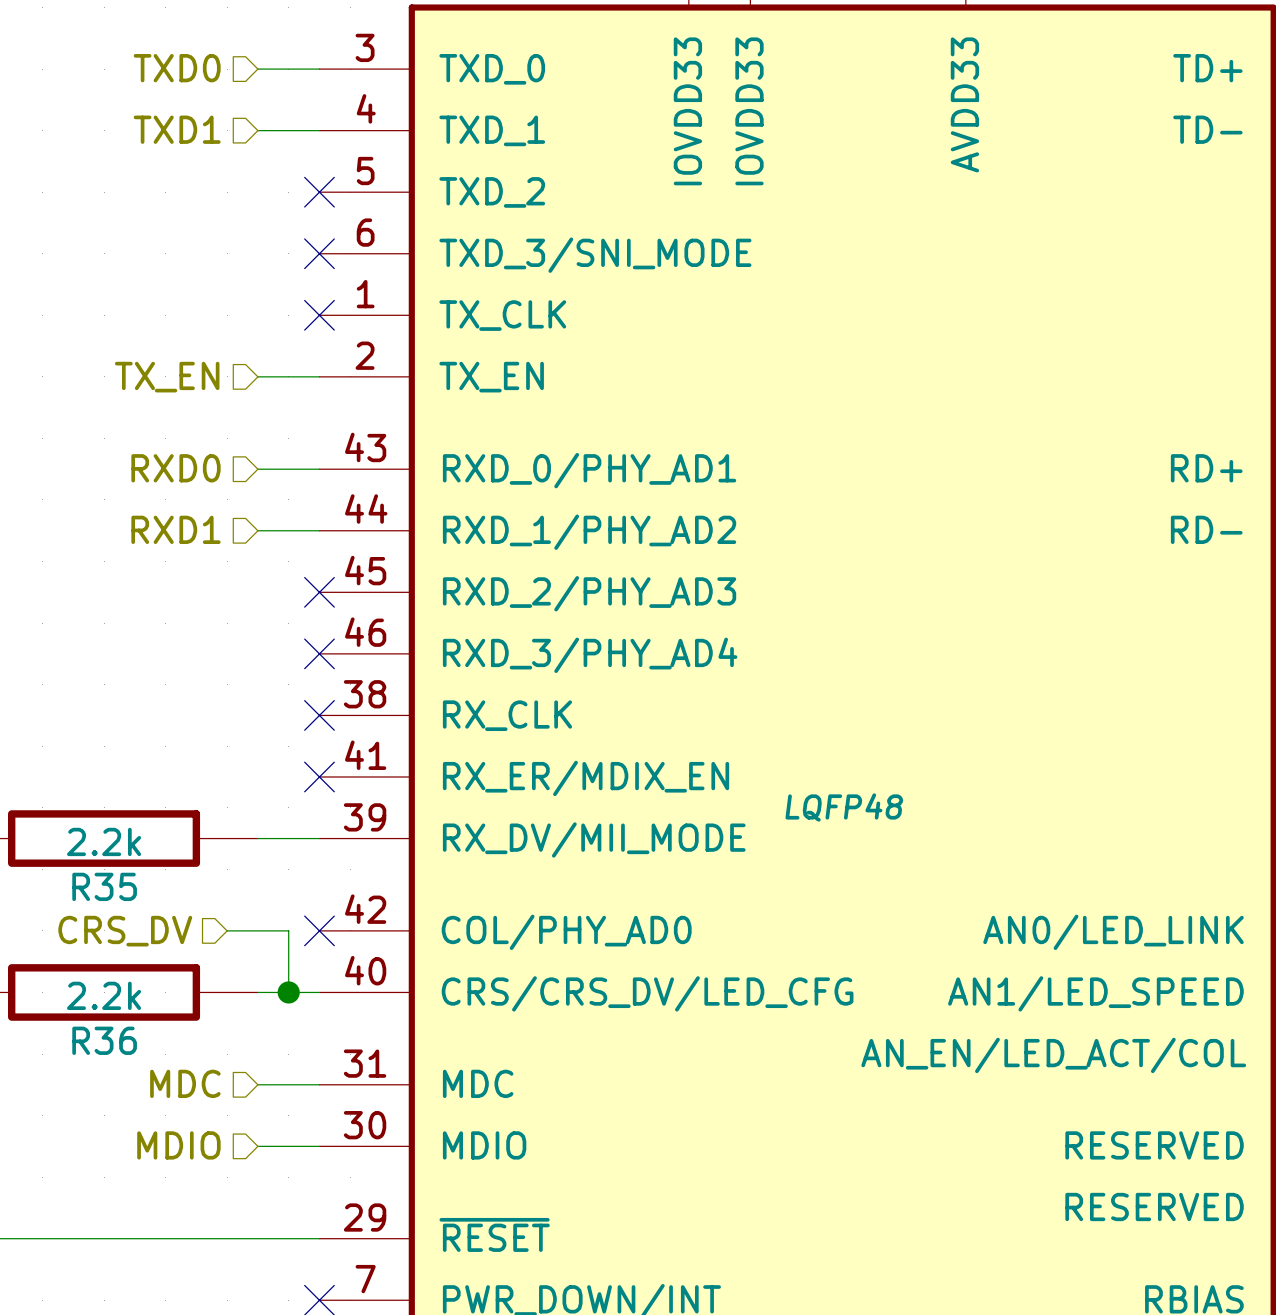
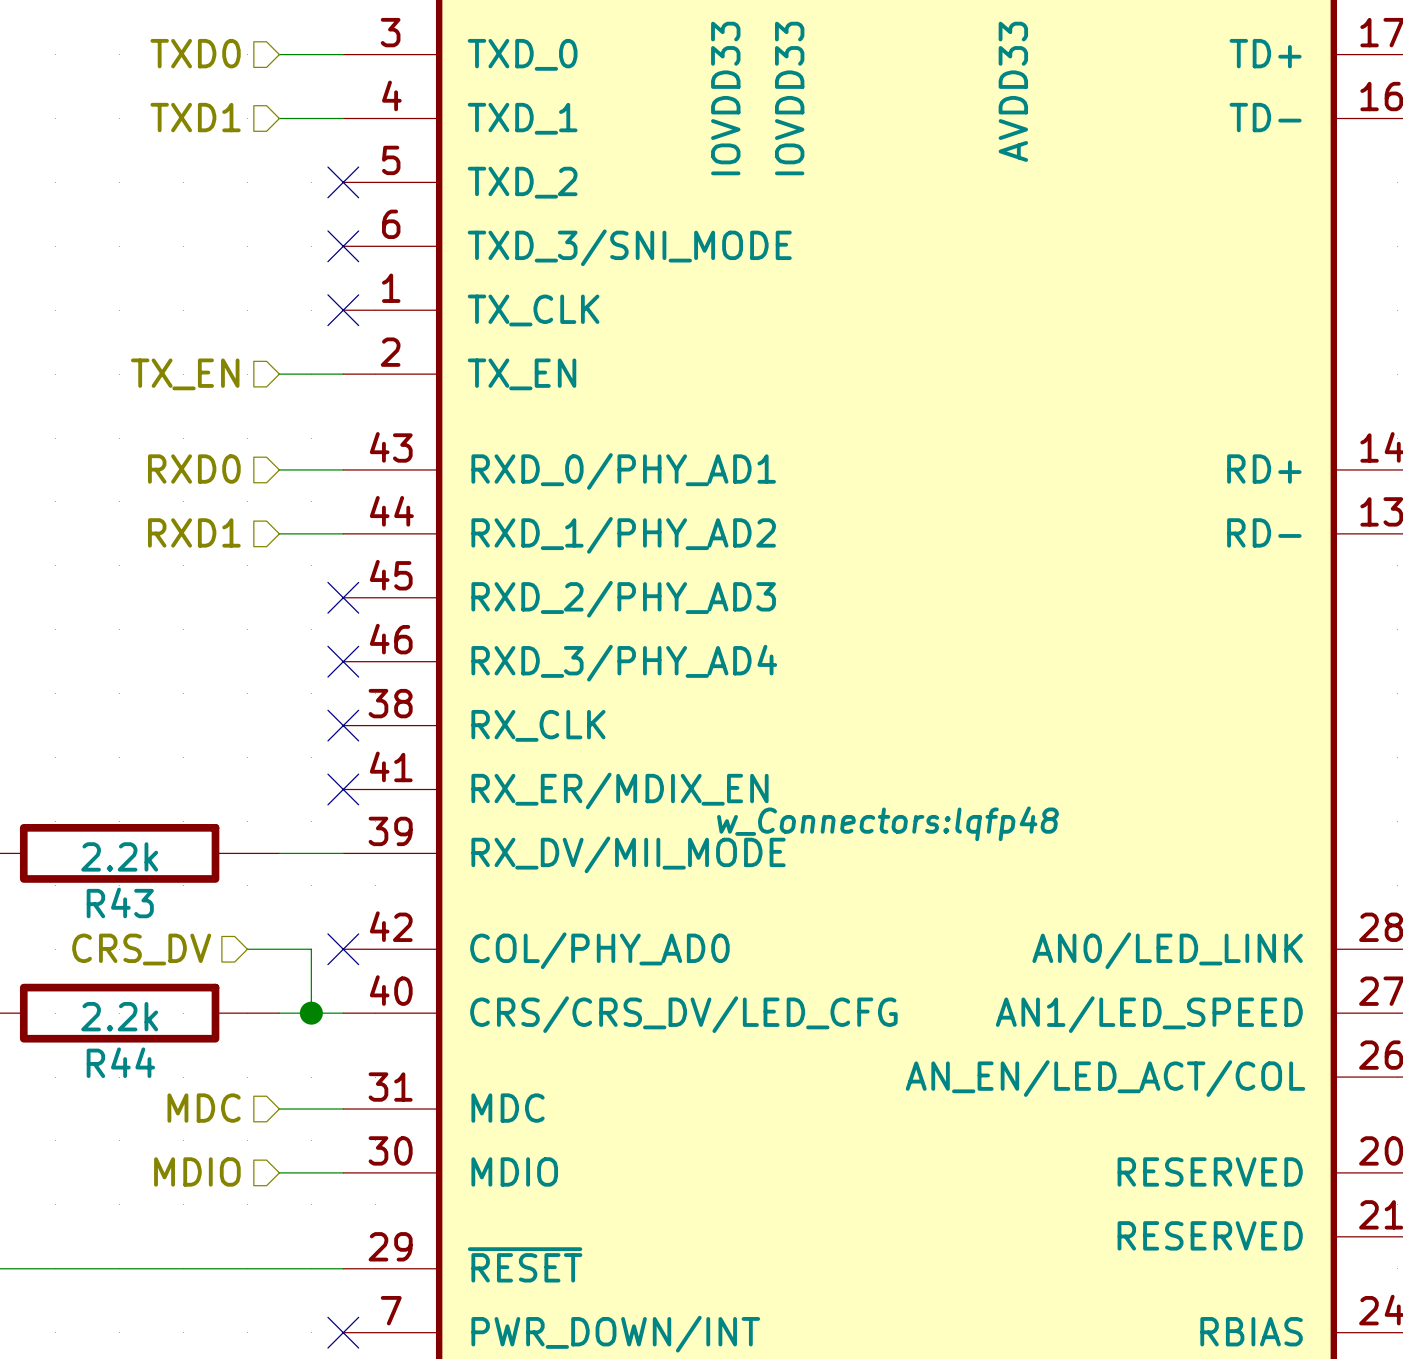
part text: LQFP48 (844, 807) -> w_Connectors:lqfp48 (888, 823)
R35 name: R35 (104, 886) -> R43 (120, 902)
R36 name: R36 (104, 1040) -> R44 (120, 1062)

